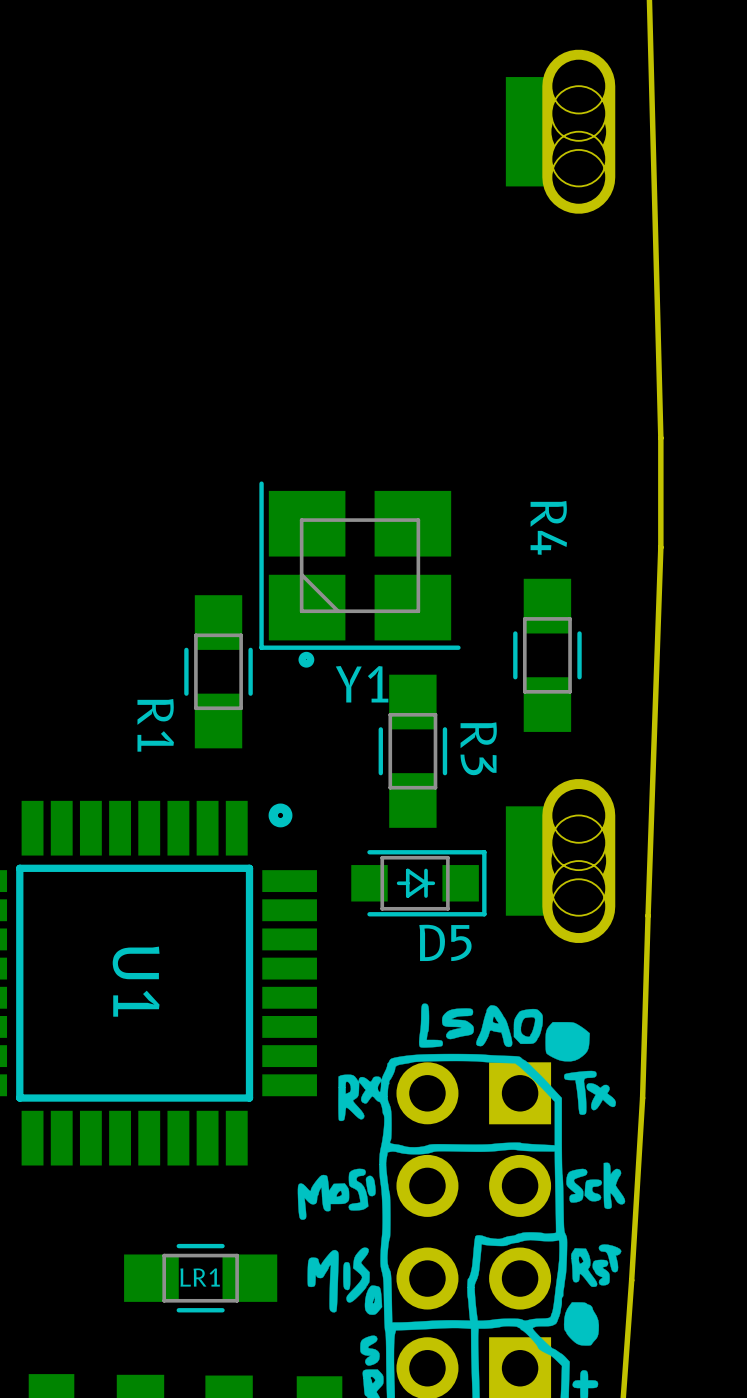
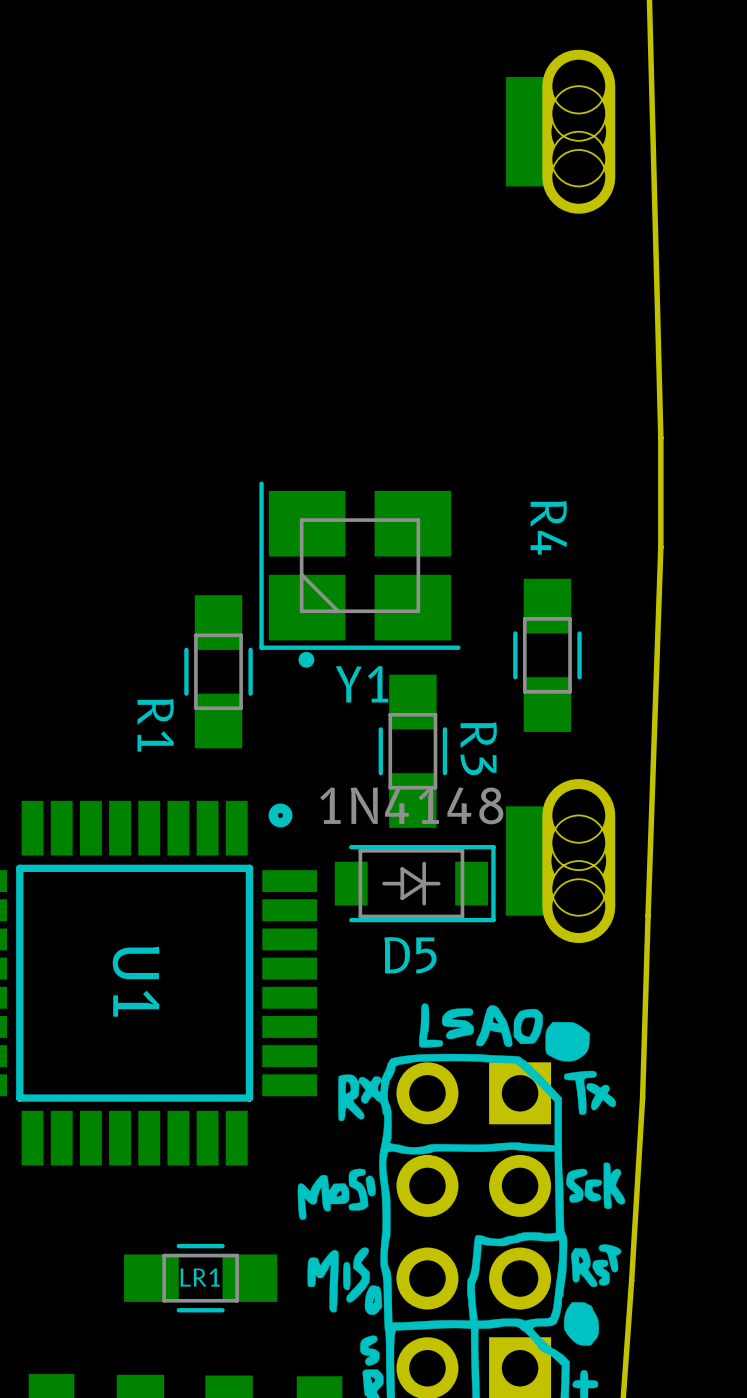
D5 value: none -> 1N4148 (411, 805)
D5 footprint: [351, 850, 487, 917] -> [334, 844, 496, 923]
D5 name position: D5 (445, 942) -> D5 (410, 955)

